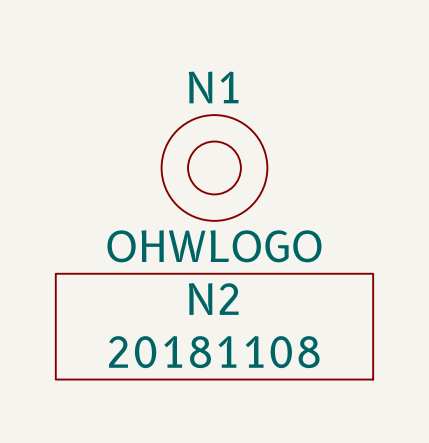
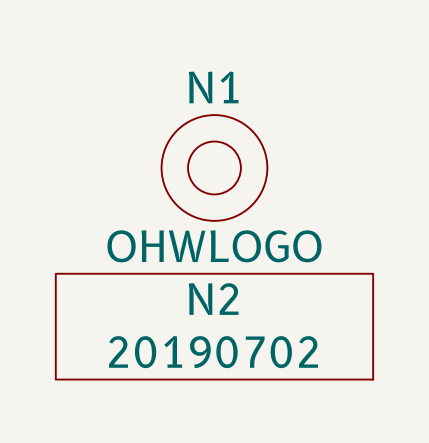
N2 value: 20181108 (214, 352) -> 20190702 (213, 352)

